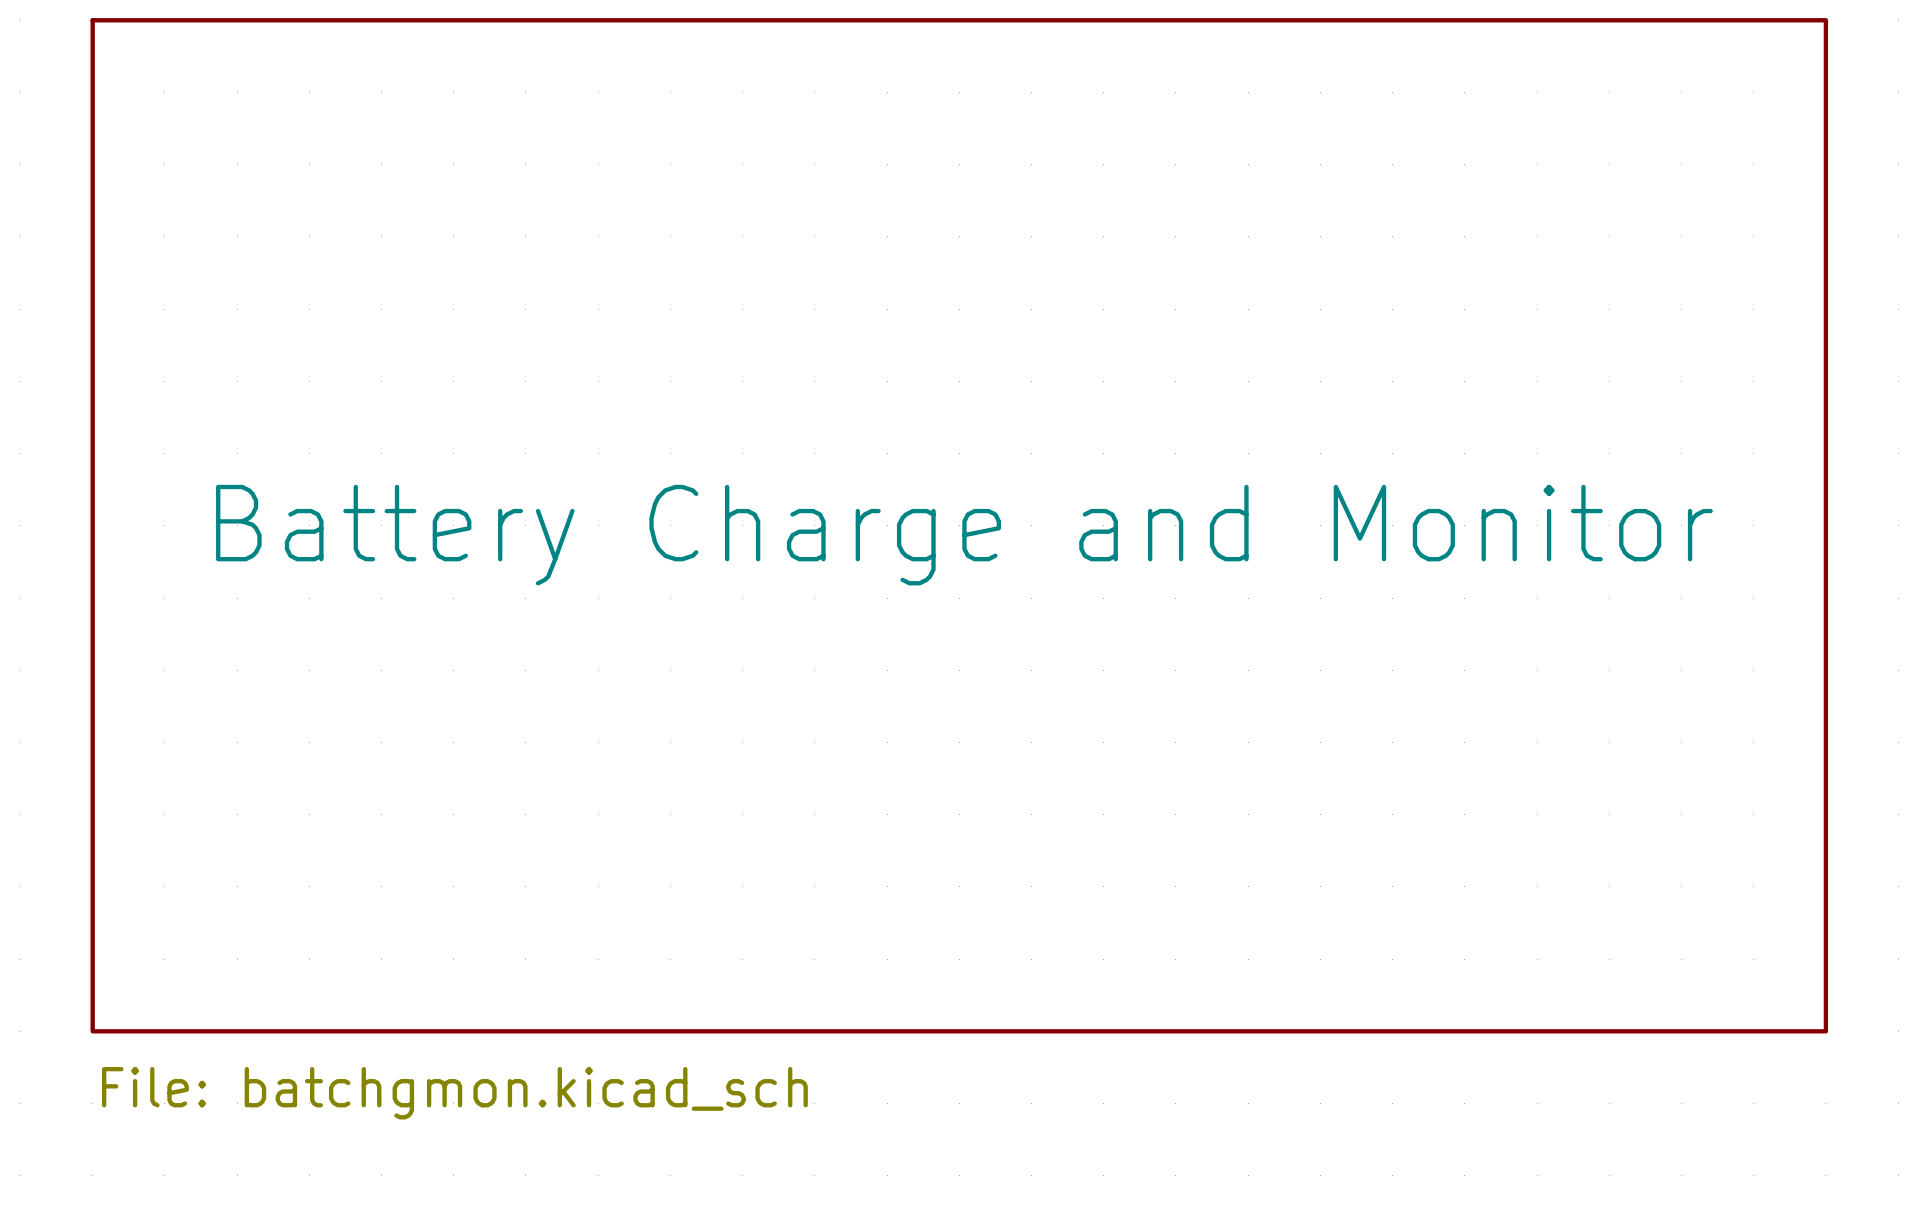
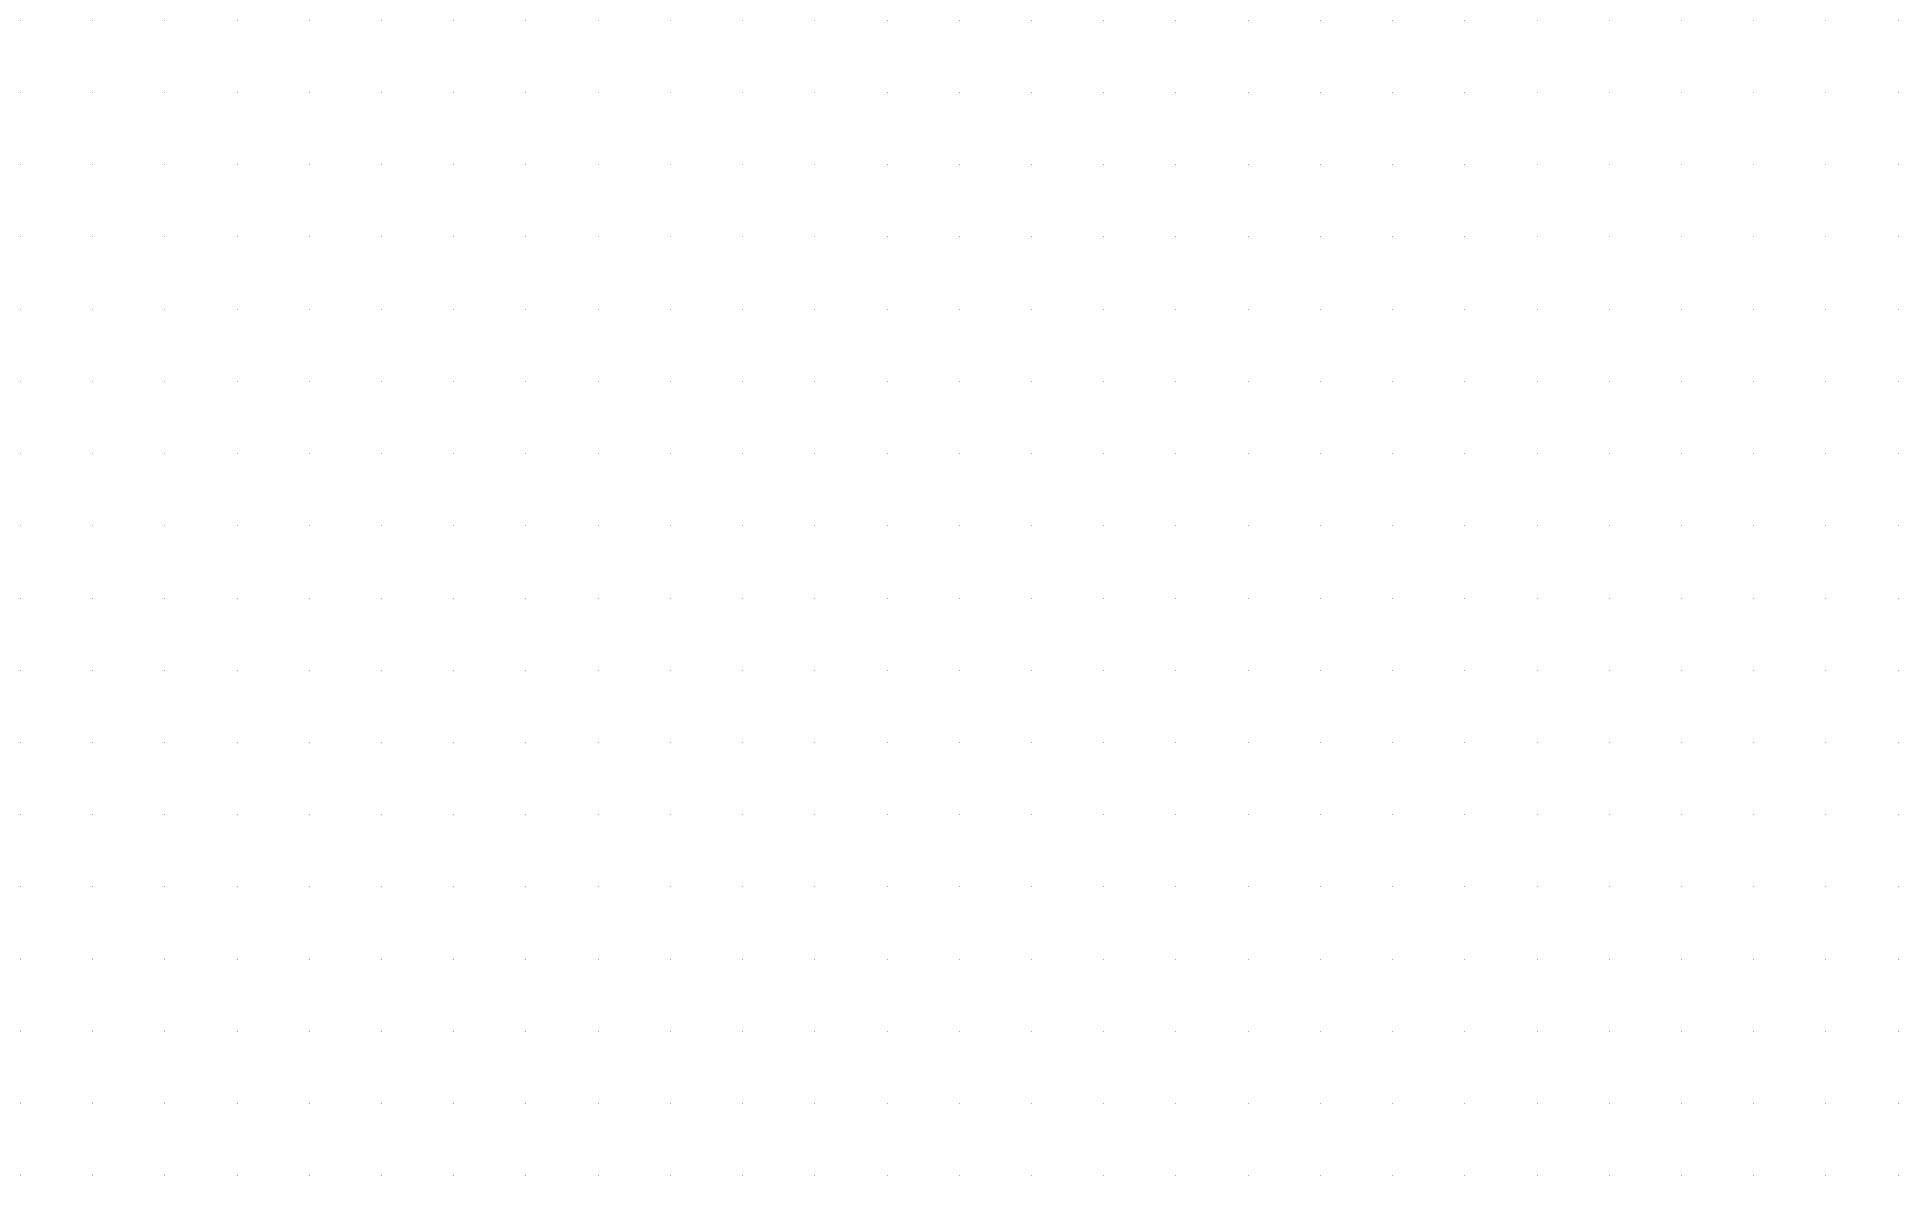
sheet Battery Charge and Monitor: File: batchgmon.kicad_sch (959, 525) -> none

